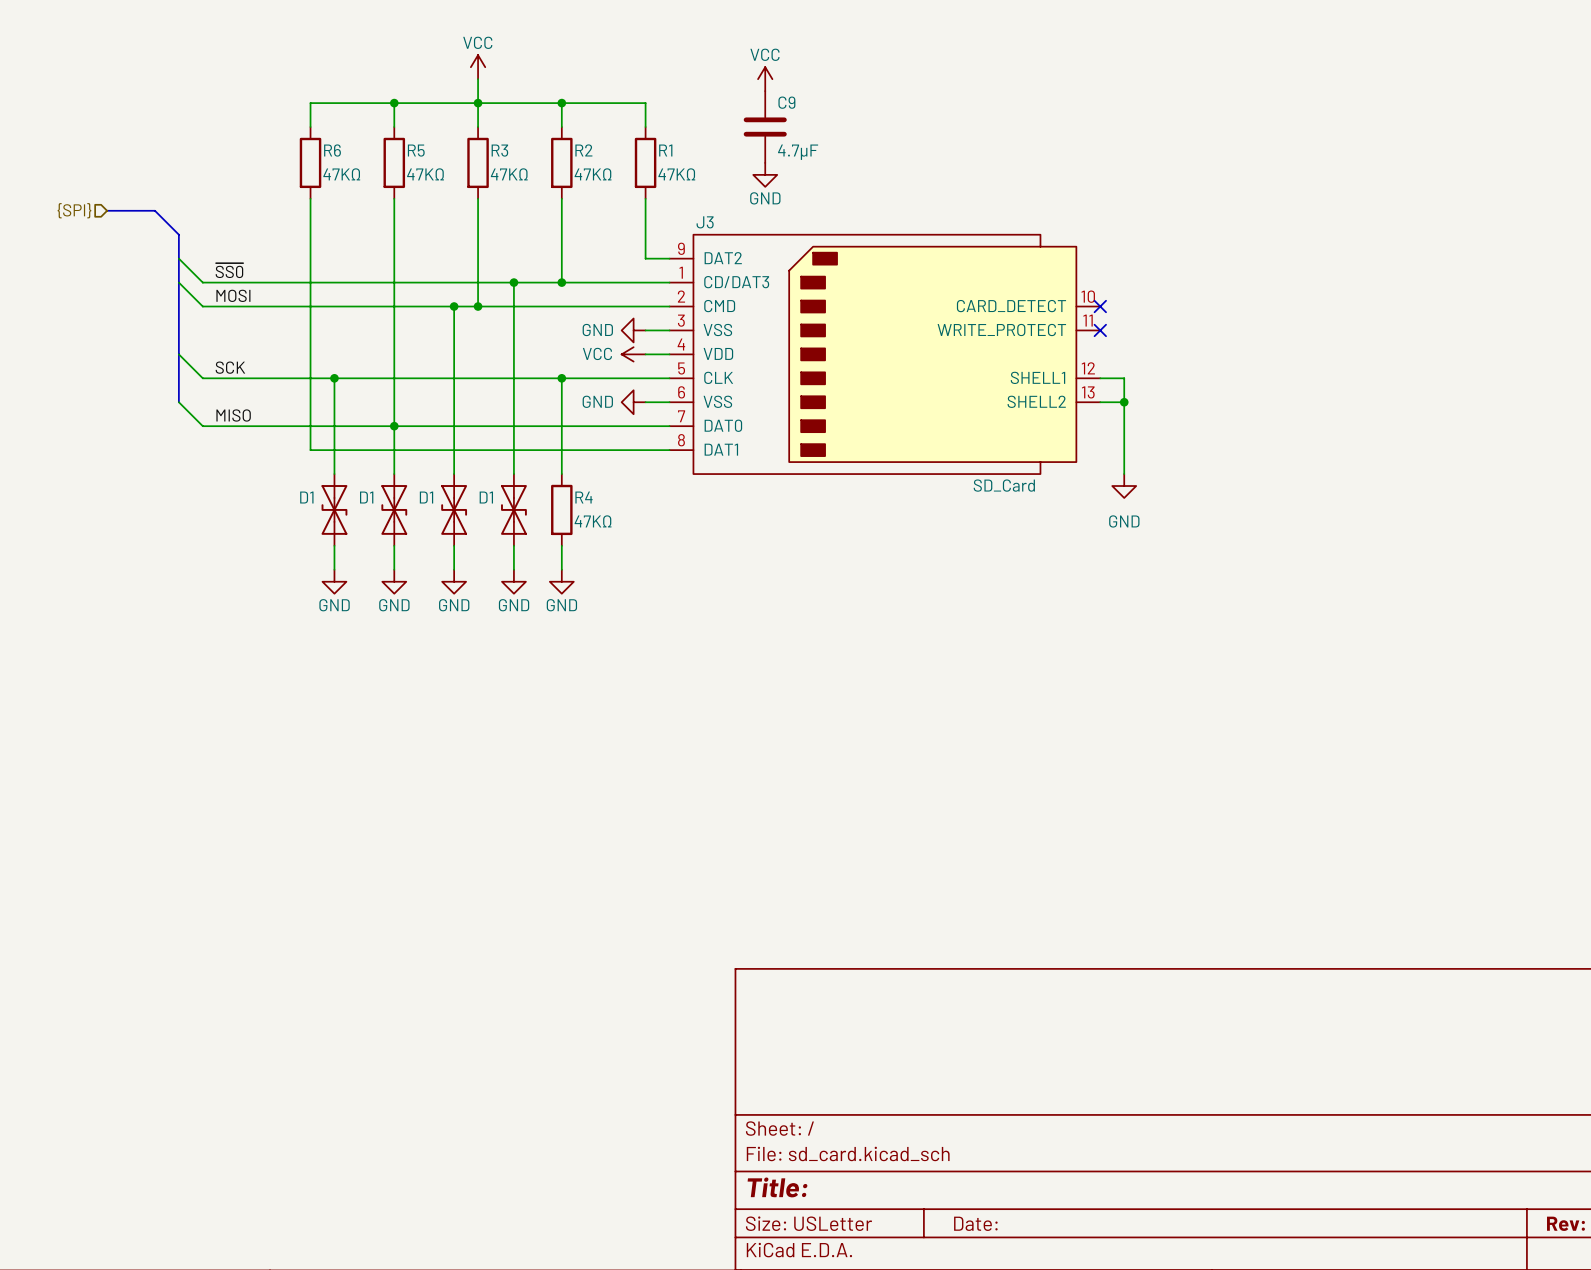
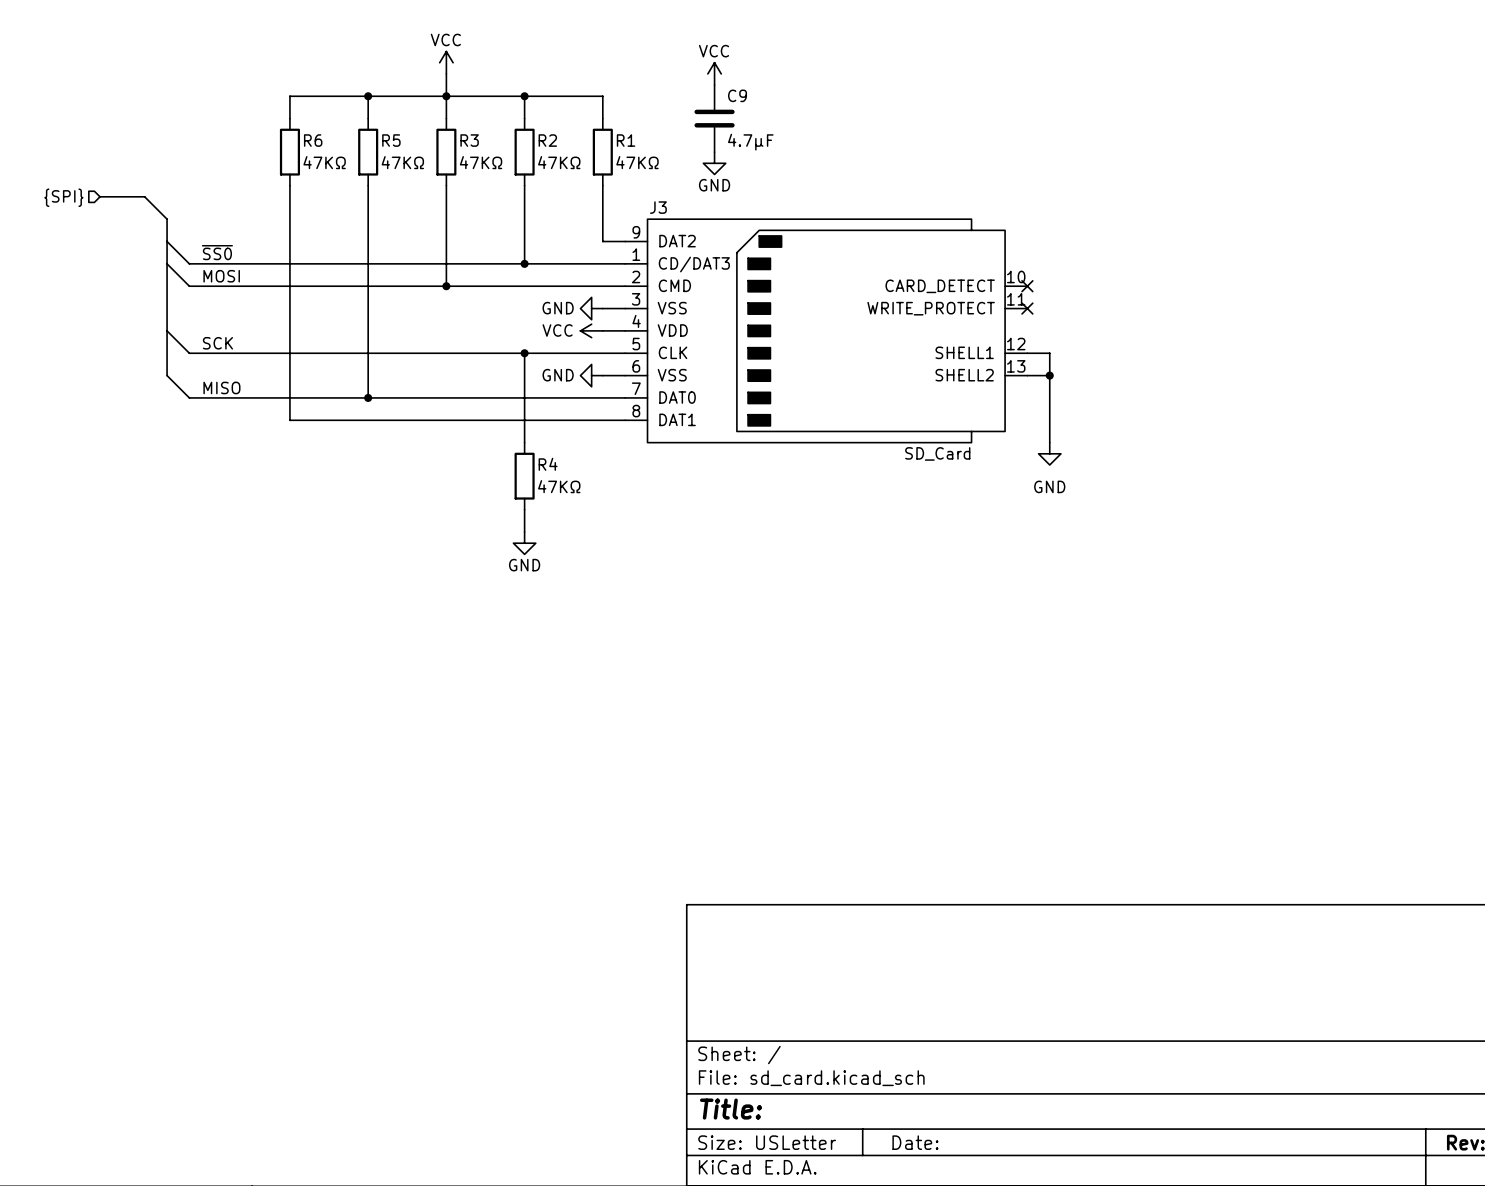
wire: (513, 282) (513, 474) -> none
junction: (513, 282) -> none
wire: (454, 306) (454, 474) -> none
junction: (454, 306) -> none
wire: (334, 378) (334, 474) -> none
junction: (334, 378) -> none
wire: (394, 426) (394, 474) -> none
D1: (334, 509) -> none
D1: (394, 509) -> none
D1: (454, 509) -> none
D1: (513, 509) -> none
wire: (334, 545) (334, 569) -> none
wire: (394, 545) (394, 569) -> none
wire: (454, 545) (454, 569) -> none
wire: (513, 545) (513, 569) -> none
power symbol: GND (334, 581) -> none
power symbol: GND (394, 581) -> none
power symbol: GND (454, 581) -> none
power symbol: GND (513, 581) -> none

